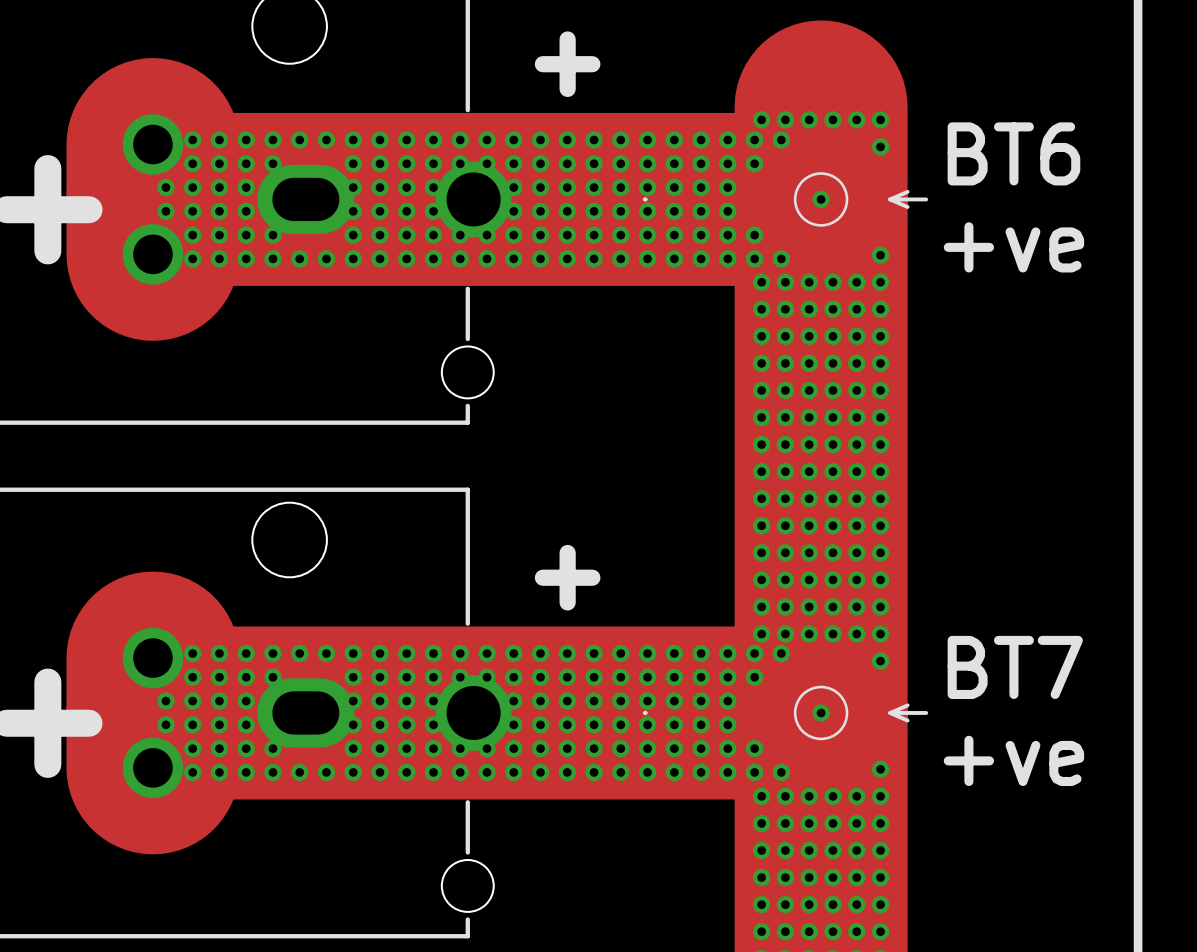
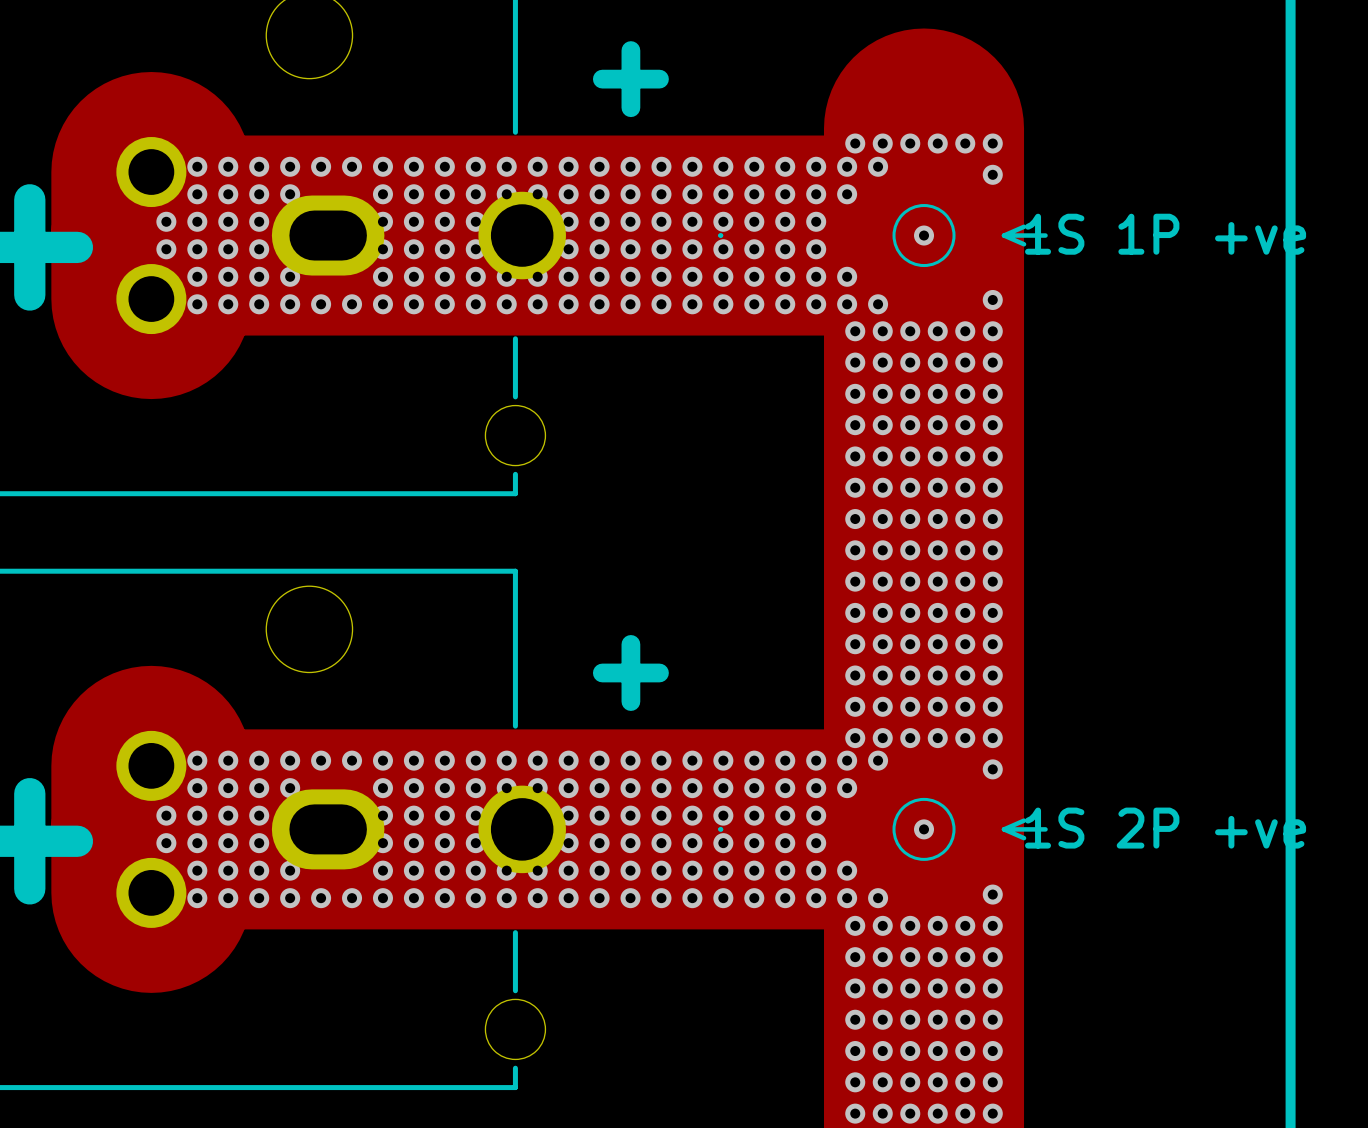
text: BT6 (1013, 153) -> none
text: none -> 1S 1P +ve (1165, 234)
text: +ve (1013, 247) -> none
text: BT7 (1015, 667) -> none
text: none -> 1S 2P +ve (1165, 828)
text: +ve (1013, 760) -> none

